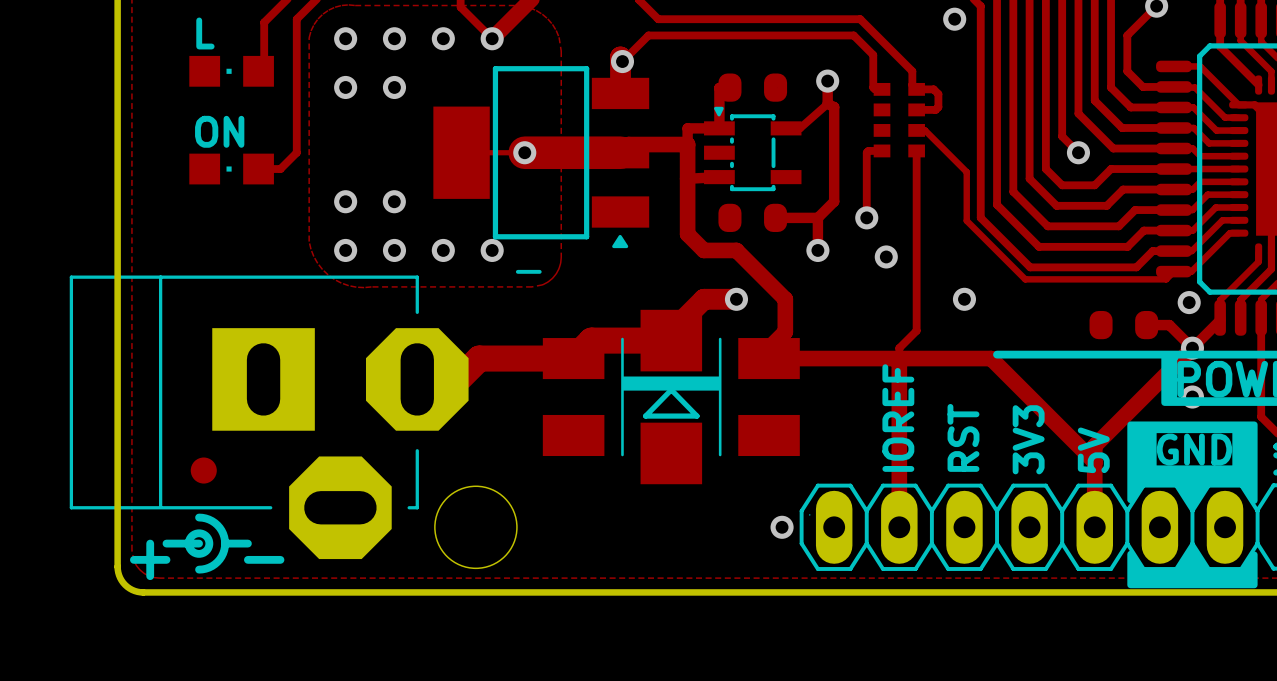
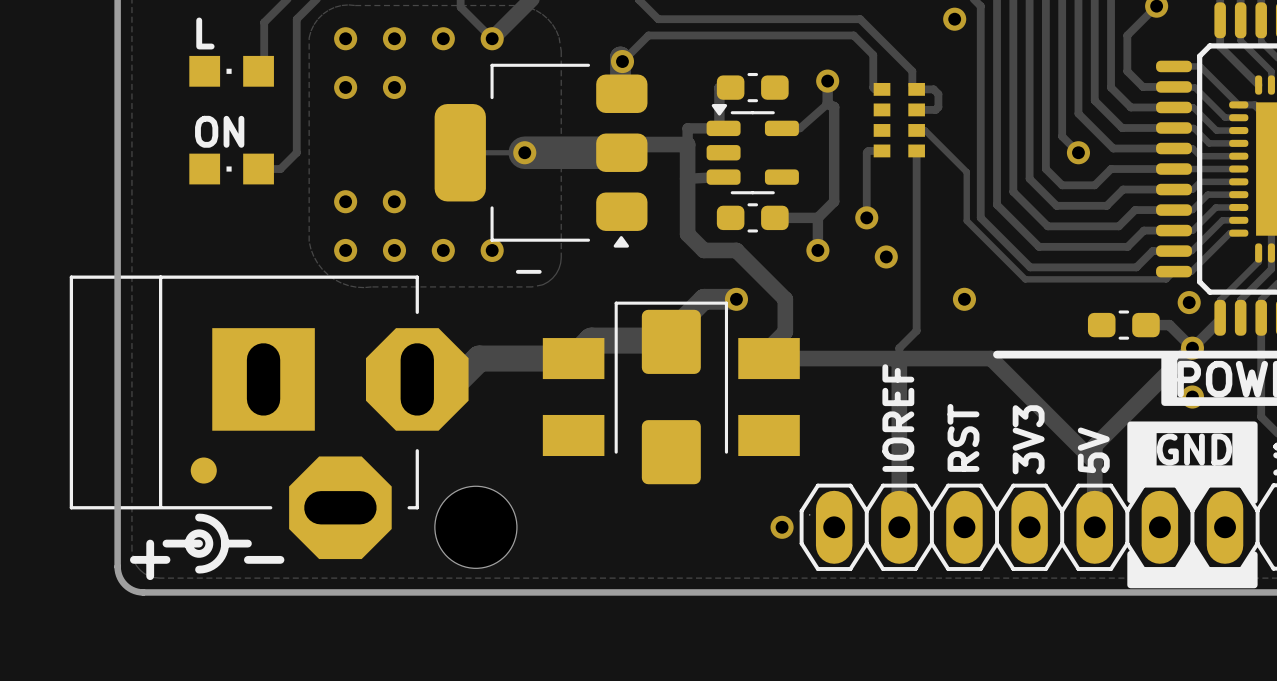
part footprint: [433, 66, 650, 249] -> [434, 63, 648, 248]
part footprint: [718, 73, 788, 102] -> [716, 72, 789, 103]
part footprint: [704, 106, 802, 192] -> [706, 104, 799, 195]
part footprint: [718, 203, 788, 232] -> [716, 203, 789, 233]
part footprint: [621, 309, 722, 485] -> [614, 301, 729, 485]
part footprint: [1089, 310, 1159, 340] -> [1087, 310, 1160, 340]

